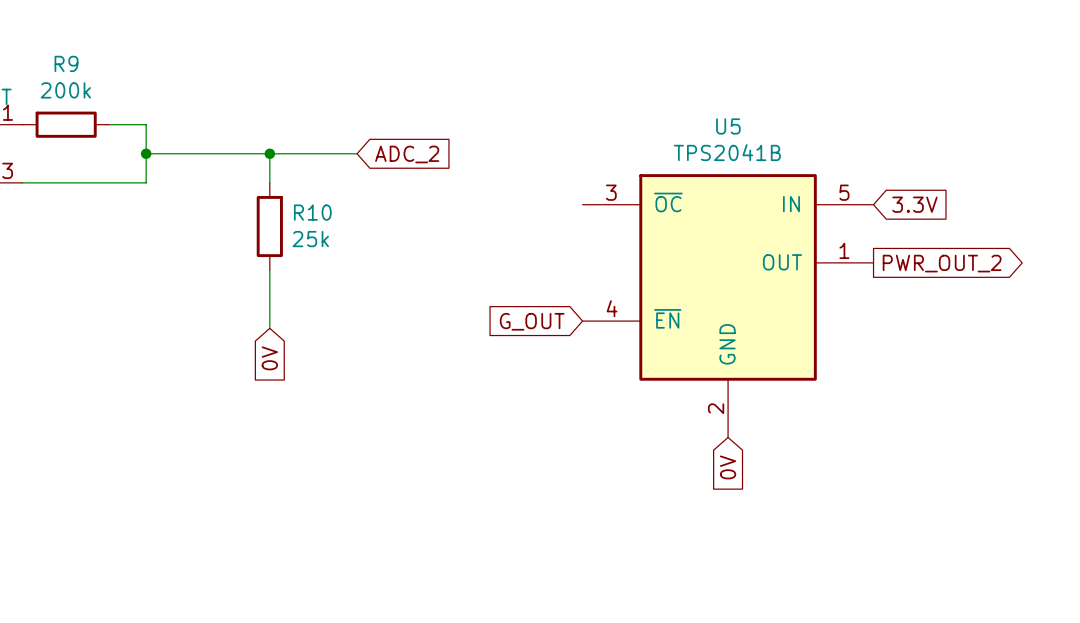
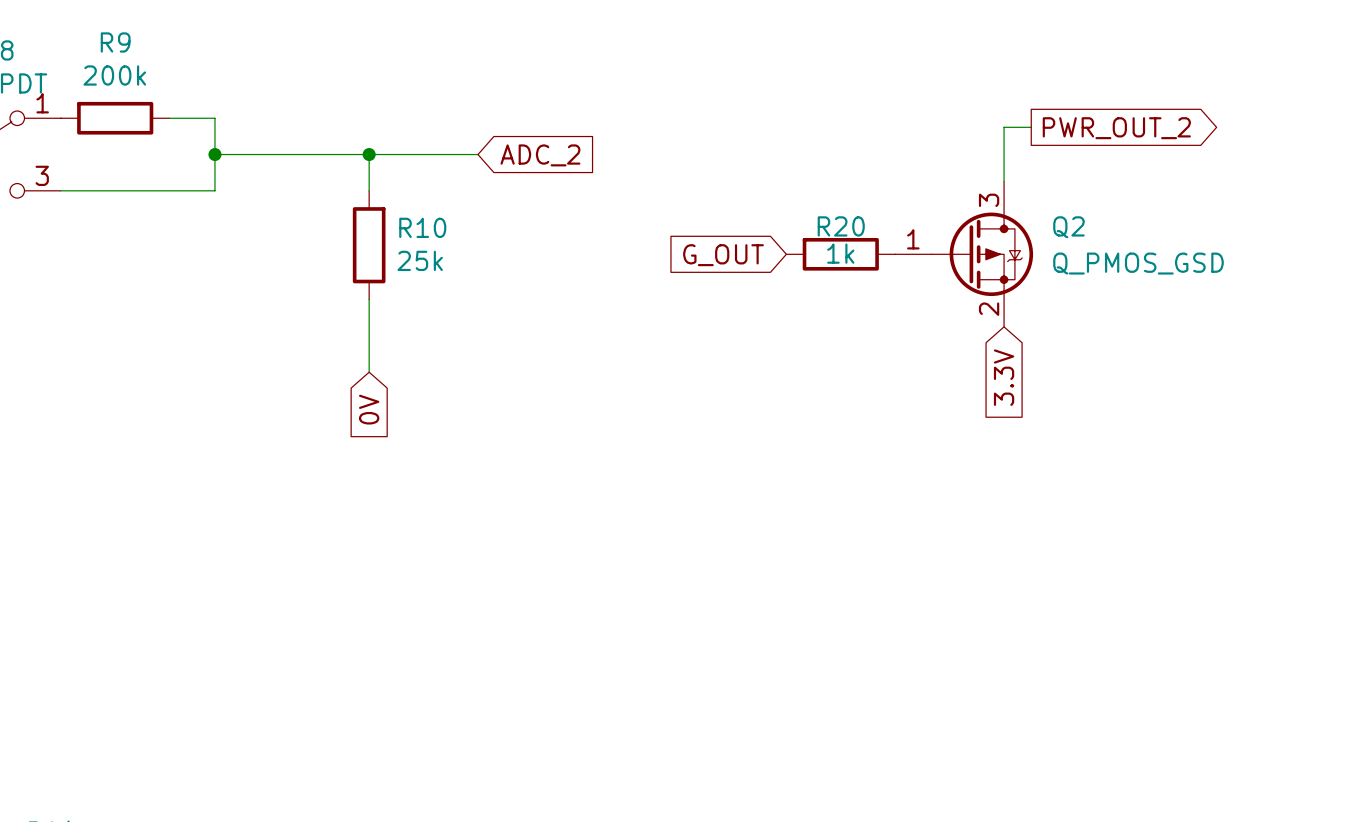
wire: none -> (1031, 127) (1004, 127) (1004, 181)
global label rotation: 0° (914, 204) -> 90° clockwise (1004, 377)
global label position: 3.3V (914, 204) -> 3.3V (1004, 377)
R20: none -> 1k (840, 254)
Q2: none -> Q_PMOS_GSD (964, 254)
global label position: PWR_OUT_2 (942, 263) -> PWR_OUT_2 (1116, 128)
U5: TPS2041B (728, 305) -> none
global label position: G_OUT (532, 321) -> G_OUT (723, 255)
global label: 0V (728, 467) -> none

